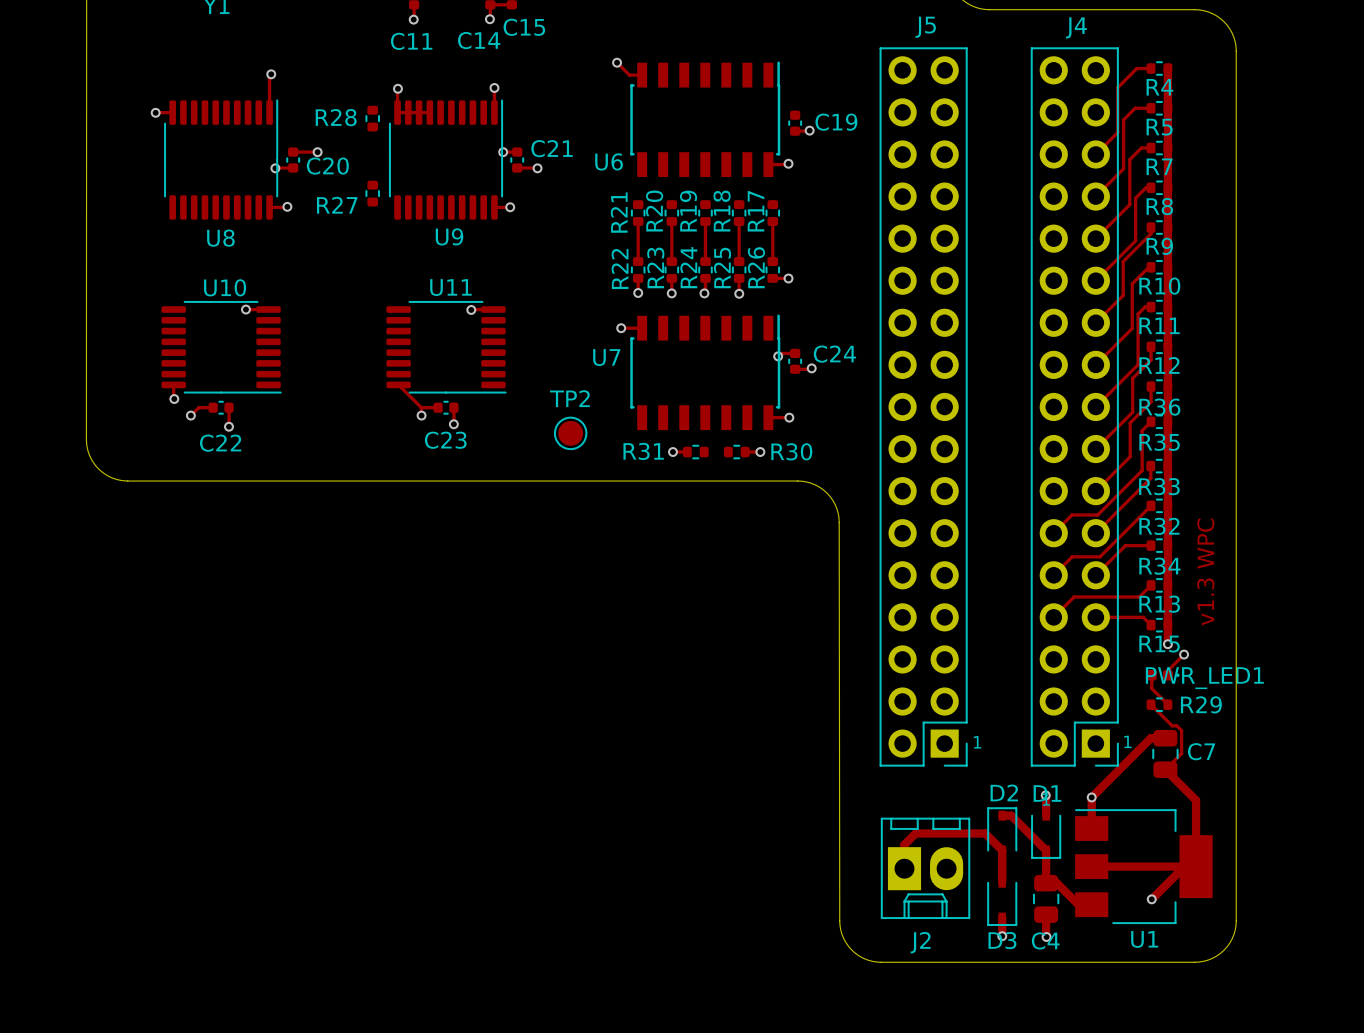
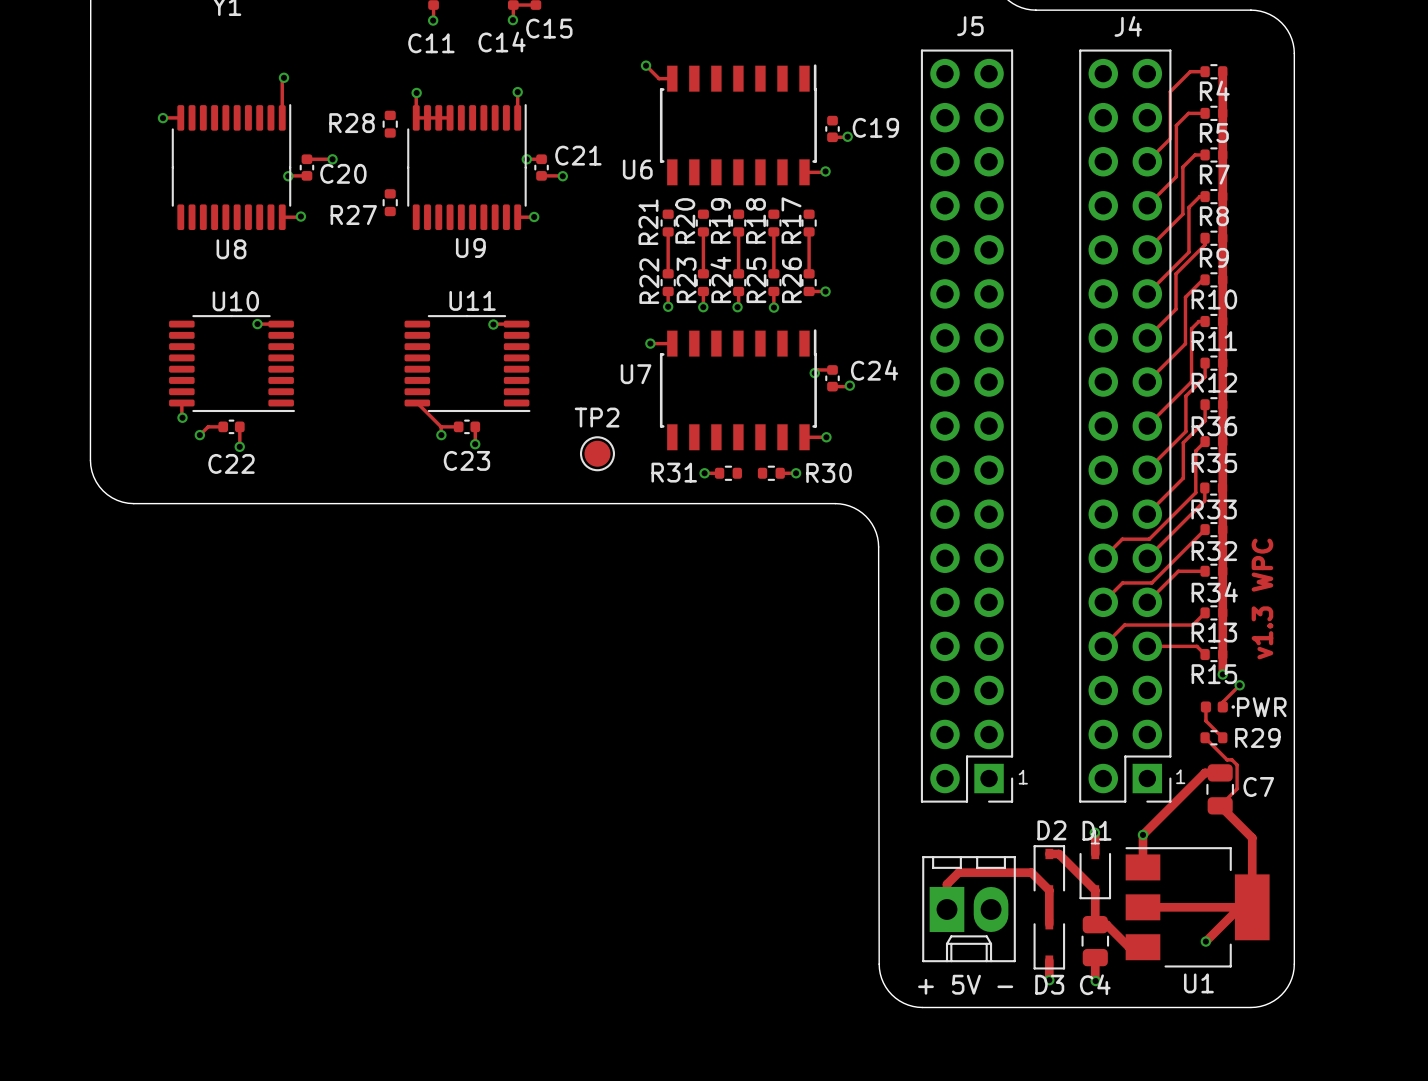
PWR_LED1 name: PWR_LED1 (1204, 678) -> PWR (1261, 707)
J2 name: J2 (920, 942) -> + 5V - (965, 984)

